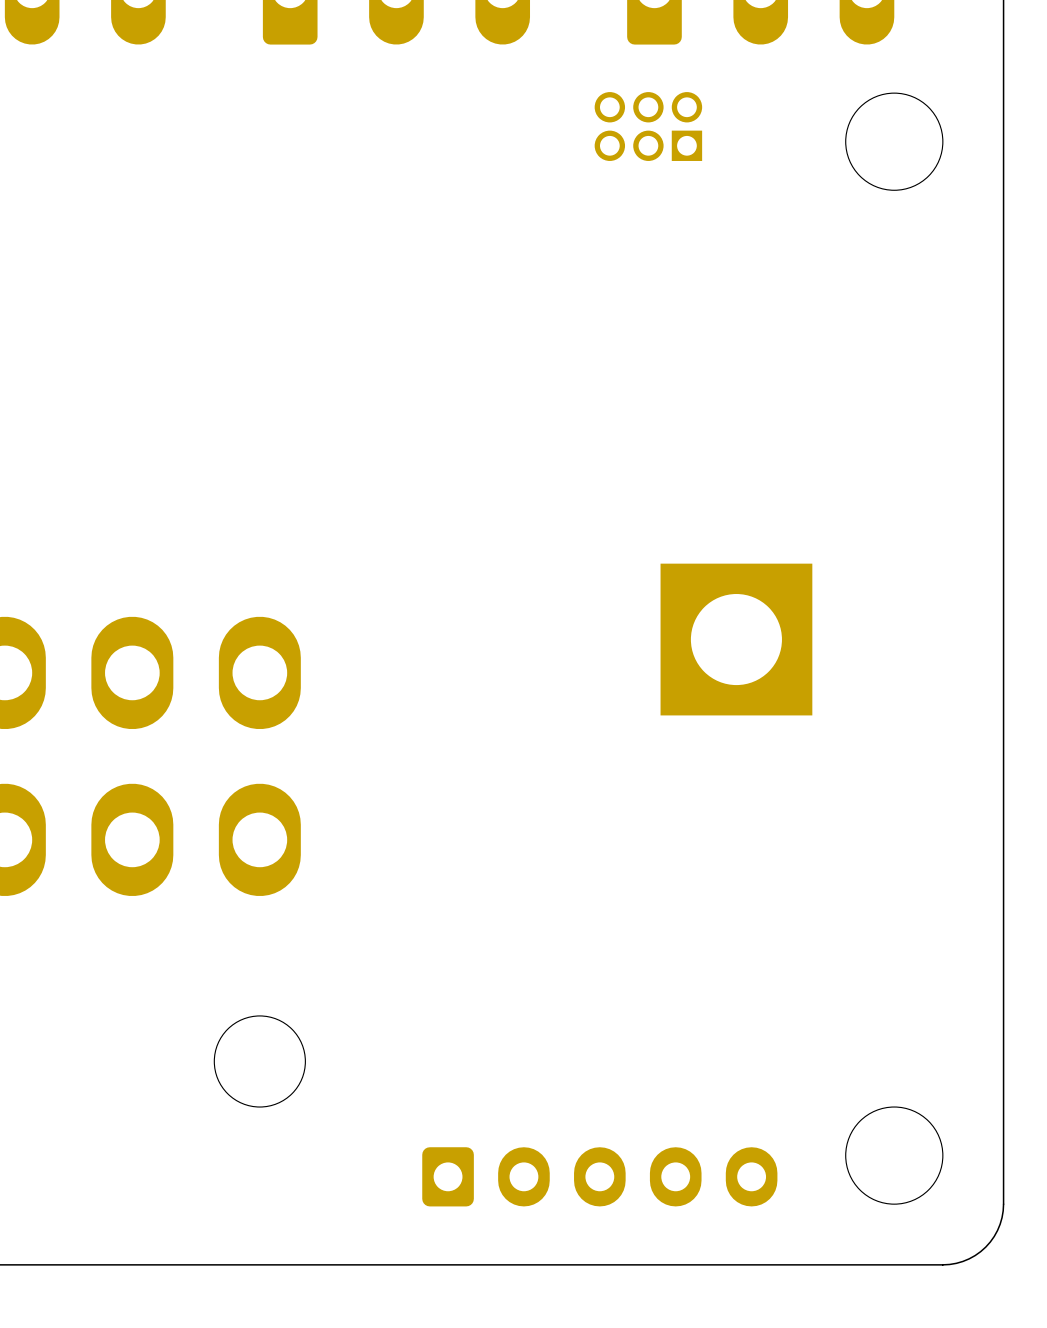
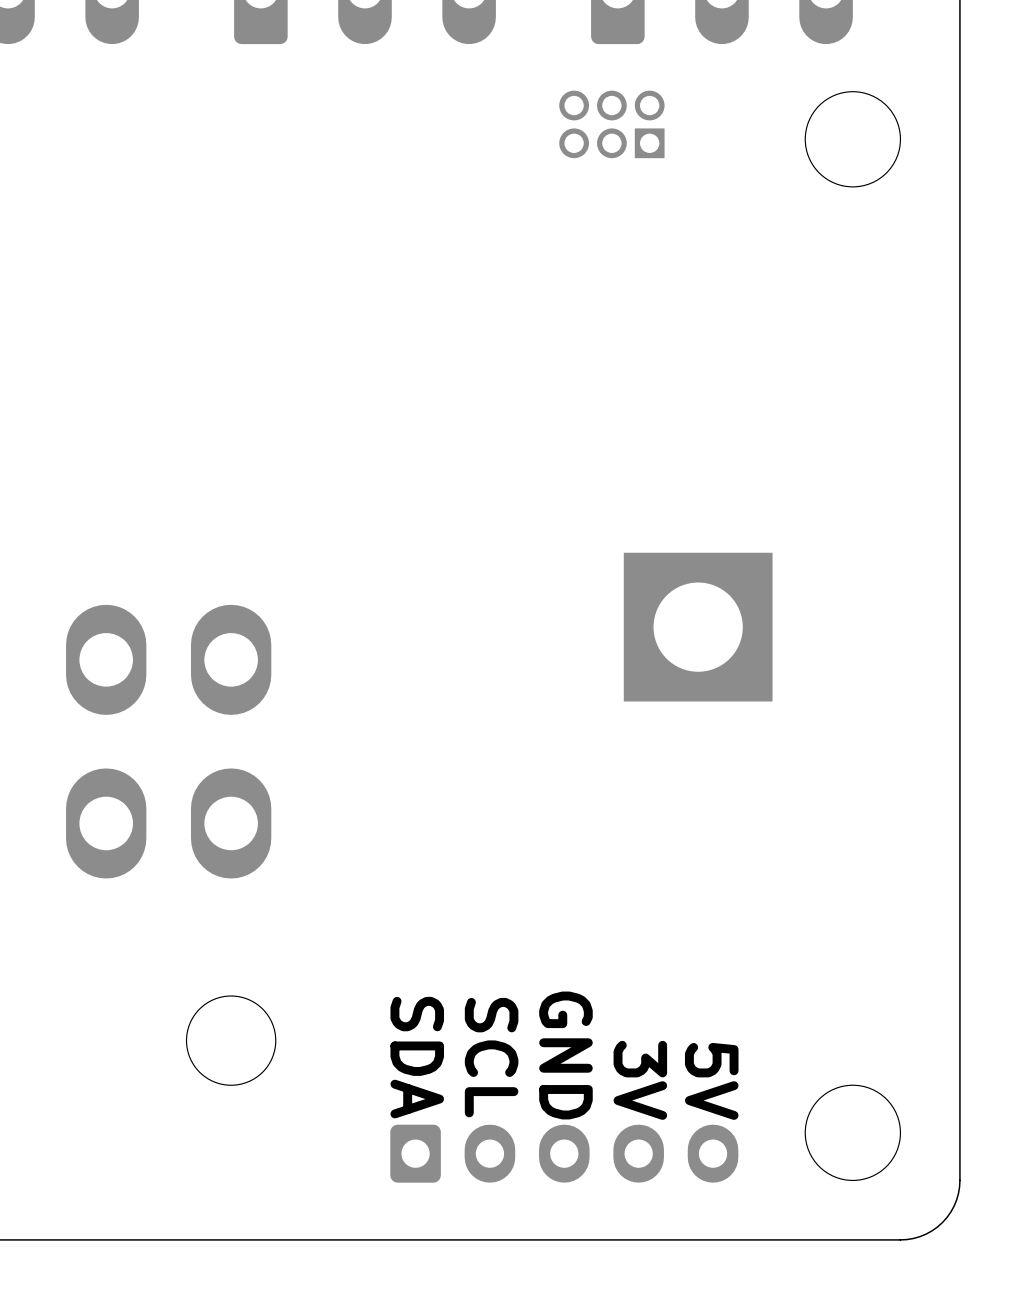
text: none -> GND (565, 1055)
text: none -> SDA (417, 1057)
text: none -> SCL (491, 1057)
text: none -> 3V (640, 1080)
text: none -> 5V (711, 1081)

